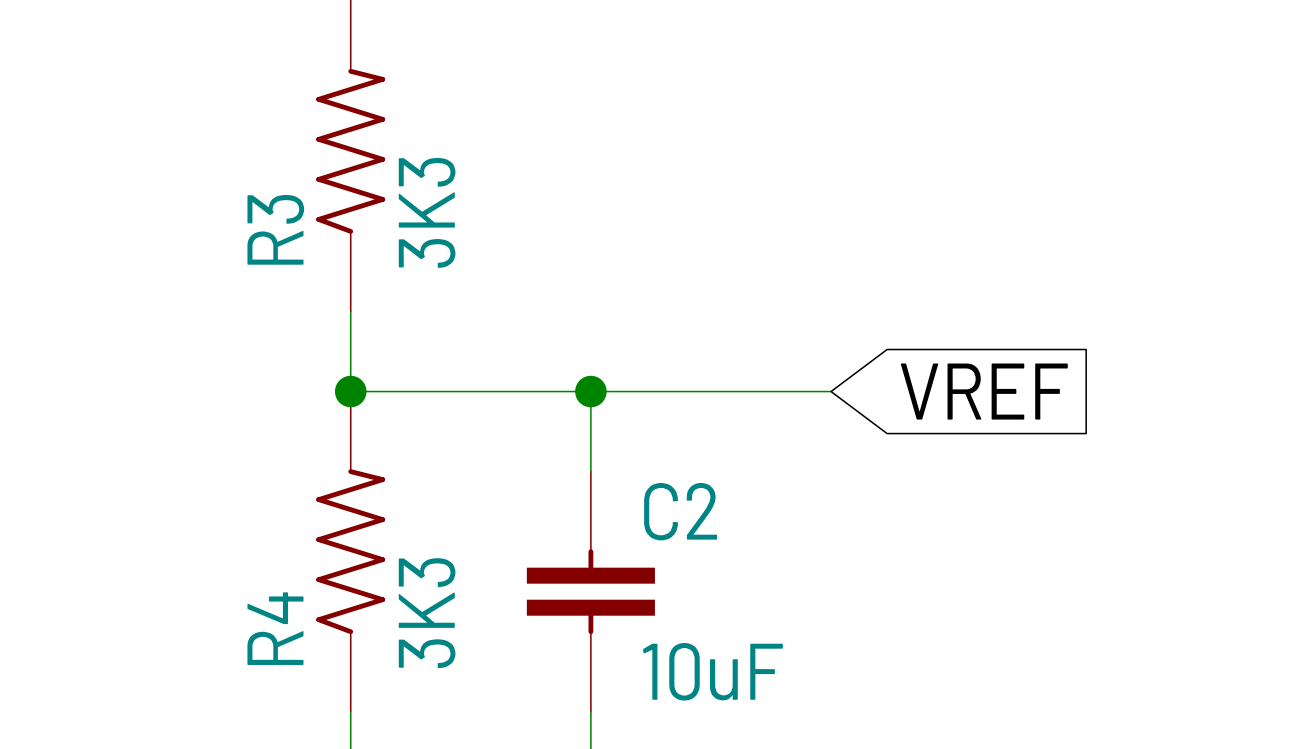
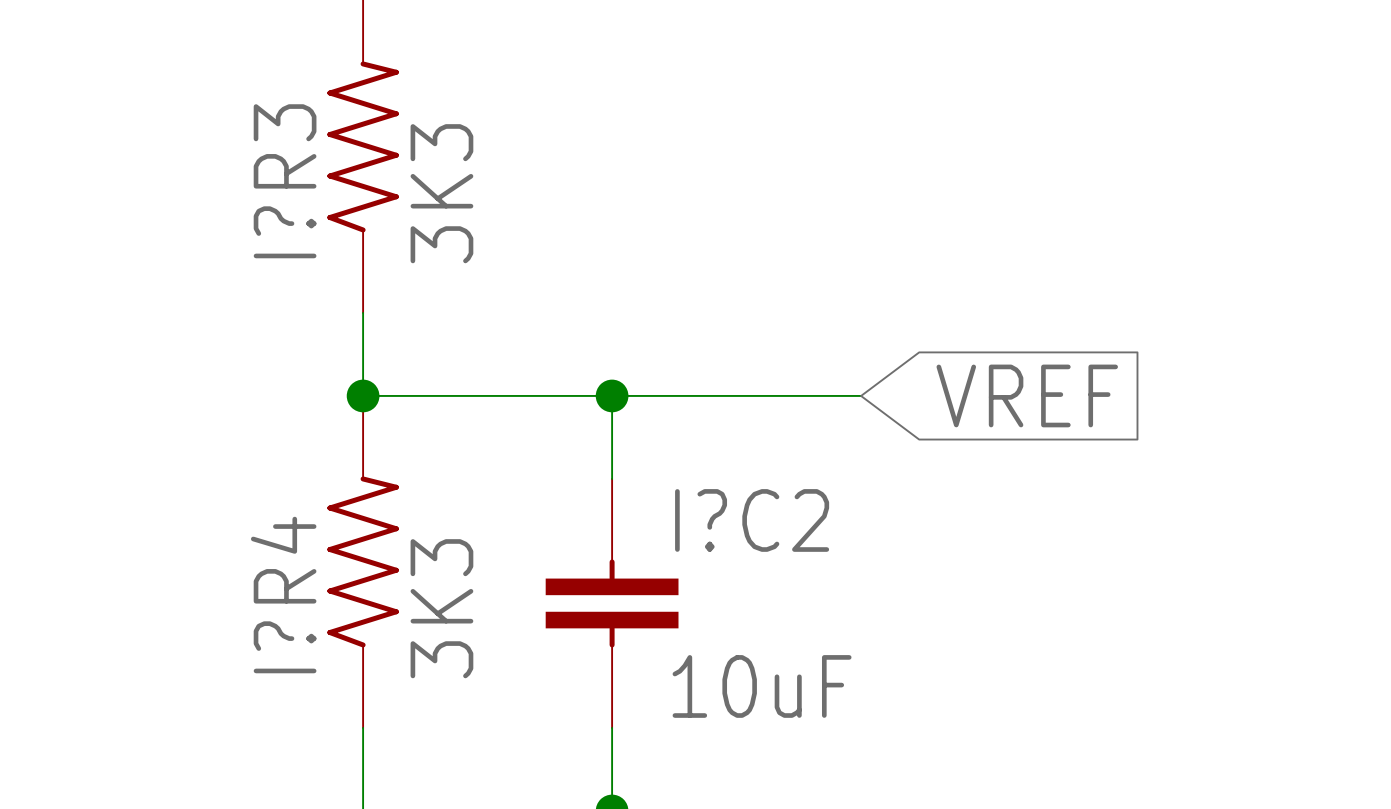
R3 name: R3 (275, 229) -> I?R3 (285, 181)
C2 name: C2 (680, 511) -> I?C2 (752, 520)
R4 name: R4 (275, 628) -> I?R4 (283, 595)

